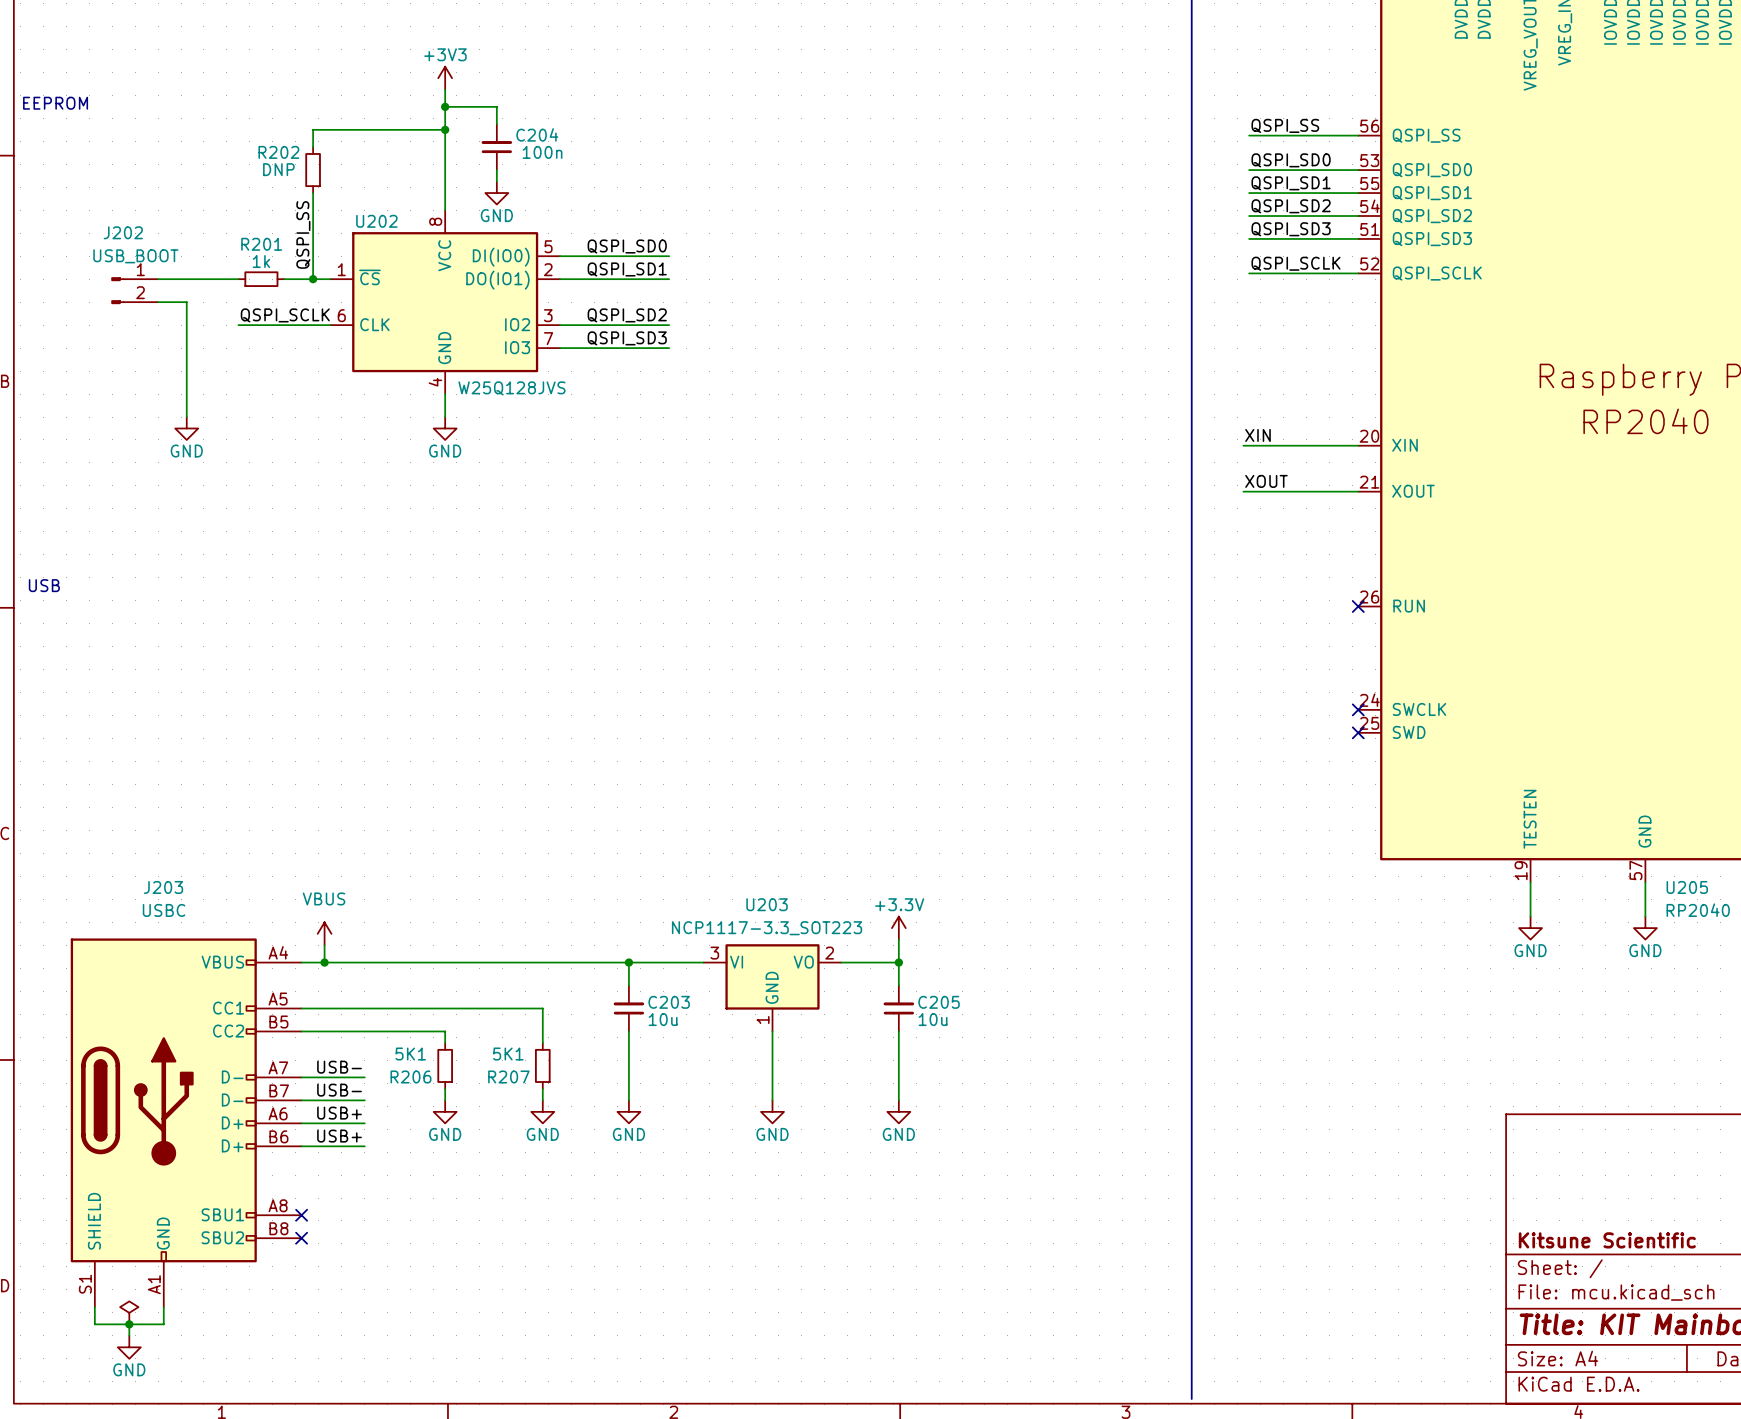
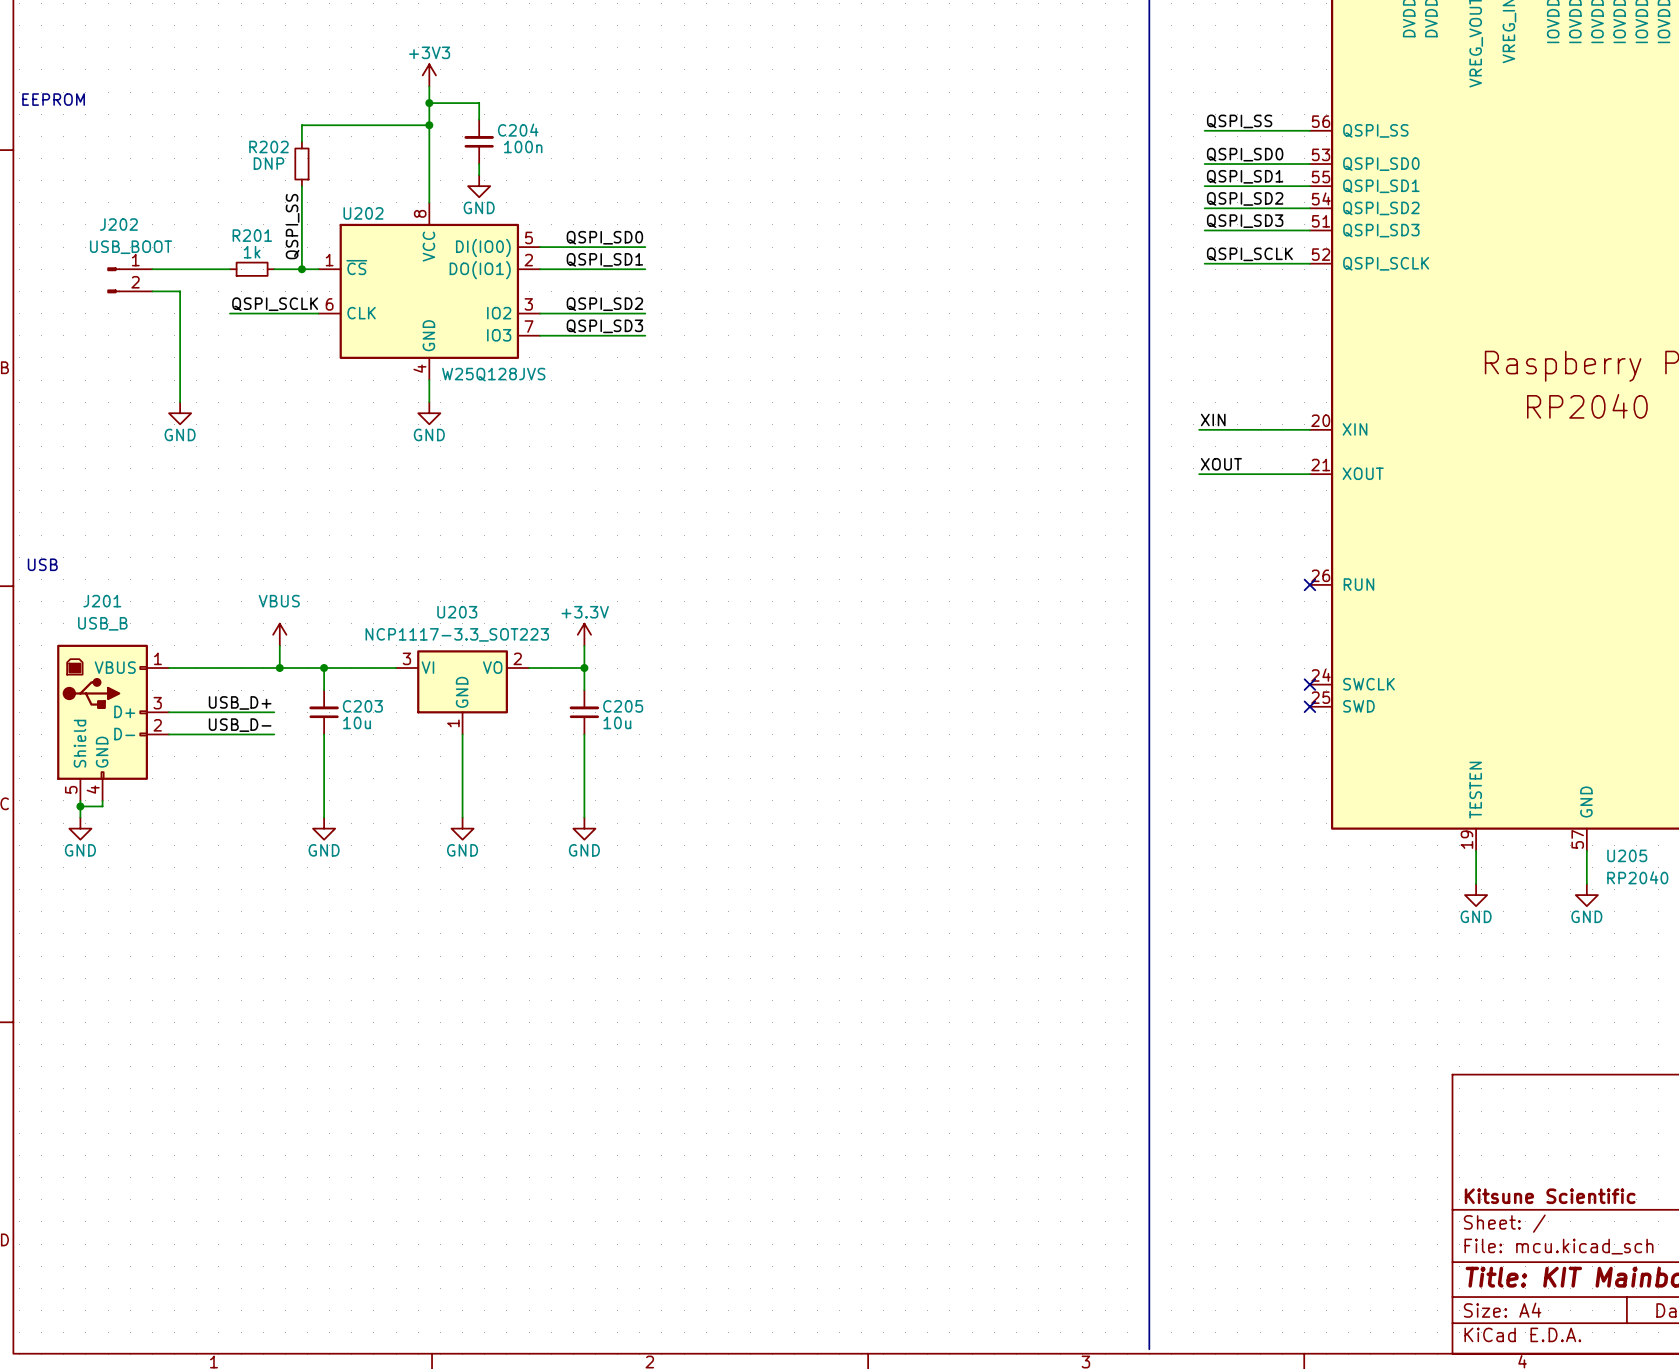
power symbol: none -> VBUS (279, 634)
power symbol: none -> +3.3V (584, 634)
wire: none -> (279, 645) (279, 668)
wire: none -> (584, 645) (584, 690)
wire: none -> (169, 668) (396, 668)
junction: none -> (279, 668)
wire: none -> (324, 668) (324, 690)
junction: none -> (324, 668)
wire: none -> (529, 668) (584, 668)
junction: none -> (584, 668)
label: none -> USB_D+ (240, 702)
wire: none -> (169, 712) (274, 712)
J201: none -> USB_B (113, 722)
label: none -> USB_D- (240, 725)
wire: none -> (169, 734) (274, 734)
wire: none -> (324, 734) (324, 817)
wire: none -> (462, 734) (462, 817)
wire: none -> (584, 734) (584, 817)
wire: none -> (80, 800) (80, 817)
wire: none -> (102, 800) (102, 806) (80, 806)
junction: none -> (80, 806)
power symbol: none -> GND (80, 828)
power symbol: none -> GND (324, 828)
power symbol: none -> GND (462, 828)
power symbol: none -> GND (584, 828)
power symbol: +3.3V (898, 928) -> none
power symbol: VBUS (324, 933) -> none
wire: (898, 939) (898, 985) -> none
wire: (324, 945) (324, 962) -> none
wire: (301, 962) (703, 962) -> none
junction: (324, 962) -> none
wire: (628, 962) (628, 985) -> none
junction: (628, 962) -> none
wire: (841, 962) (898, 962) -> none
junction: (898, 962) -> none
U203 position: (772, 987) -> (462, 692)
wire: (301, 1008) (542, 1008) (542, 1042) -> none
C203 position: (628, 1008) -> (324, 712)
C205 position: (898, 1008) -> (584, 712)
wire: (301, 1031) (445, 1031) (445, 1042) -> none
wire: (628, 1031) (628, 1100) -> none
wire: (772, 1031) (772, 1100) -> none
wire: (898, 1031) (898, 1100) -> none
R206: 5K1 (445, 1065) -> none
R207: 5K1 (542, 1065) -> none
label: USB- (339, 1067) -> none
wire: (301, 1077) (364, 1077) -> none
wire: (445, 1088) (445, 1100) -> none
wire: (542, 1088) (542, 1100) -> none
label: USB- (339, 1090) -> none
wire: (301, 1100) (364, 1100) -> none
power symbol: GND (445, 1111) -> none
power symbol: GND (542, 1111) -> none
power symbol: GND (628, 1111) -> none
power symbol: GND (772, 1111) -> none
power symbol: GND (898, 1111) -> none
label: USB+ (339, 1113) -> none
J203: USBC (186, 1122) -> none
wire: (301, 1123) (364, 1123) -> none
label: USB+ (339, 1136) -> none
wire: (301, 1146) (364, 1146) -> none
no-connect mark: (301, 1215) -> none
no-connect mark: (301, 1238) -> none
wire: (94, 1307) (94, 1324) (163, 1324) (163, 1307) -> none
power symbol: (129, 1312) -> none
wire: (129, 1324) (129, 1335) -> none
junction: (129, 1324) -> none
power symbol: GND (129, 1347) -> none

